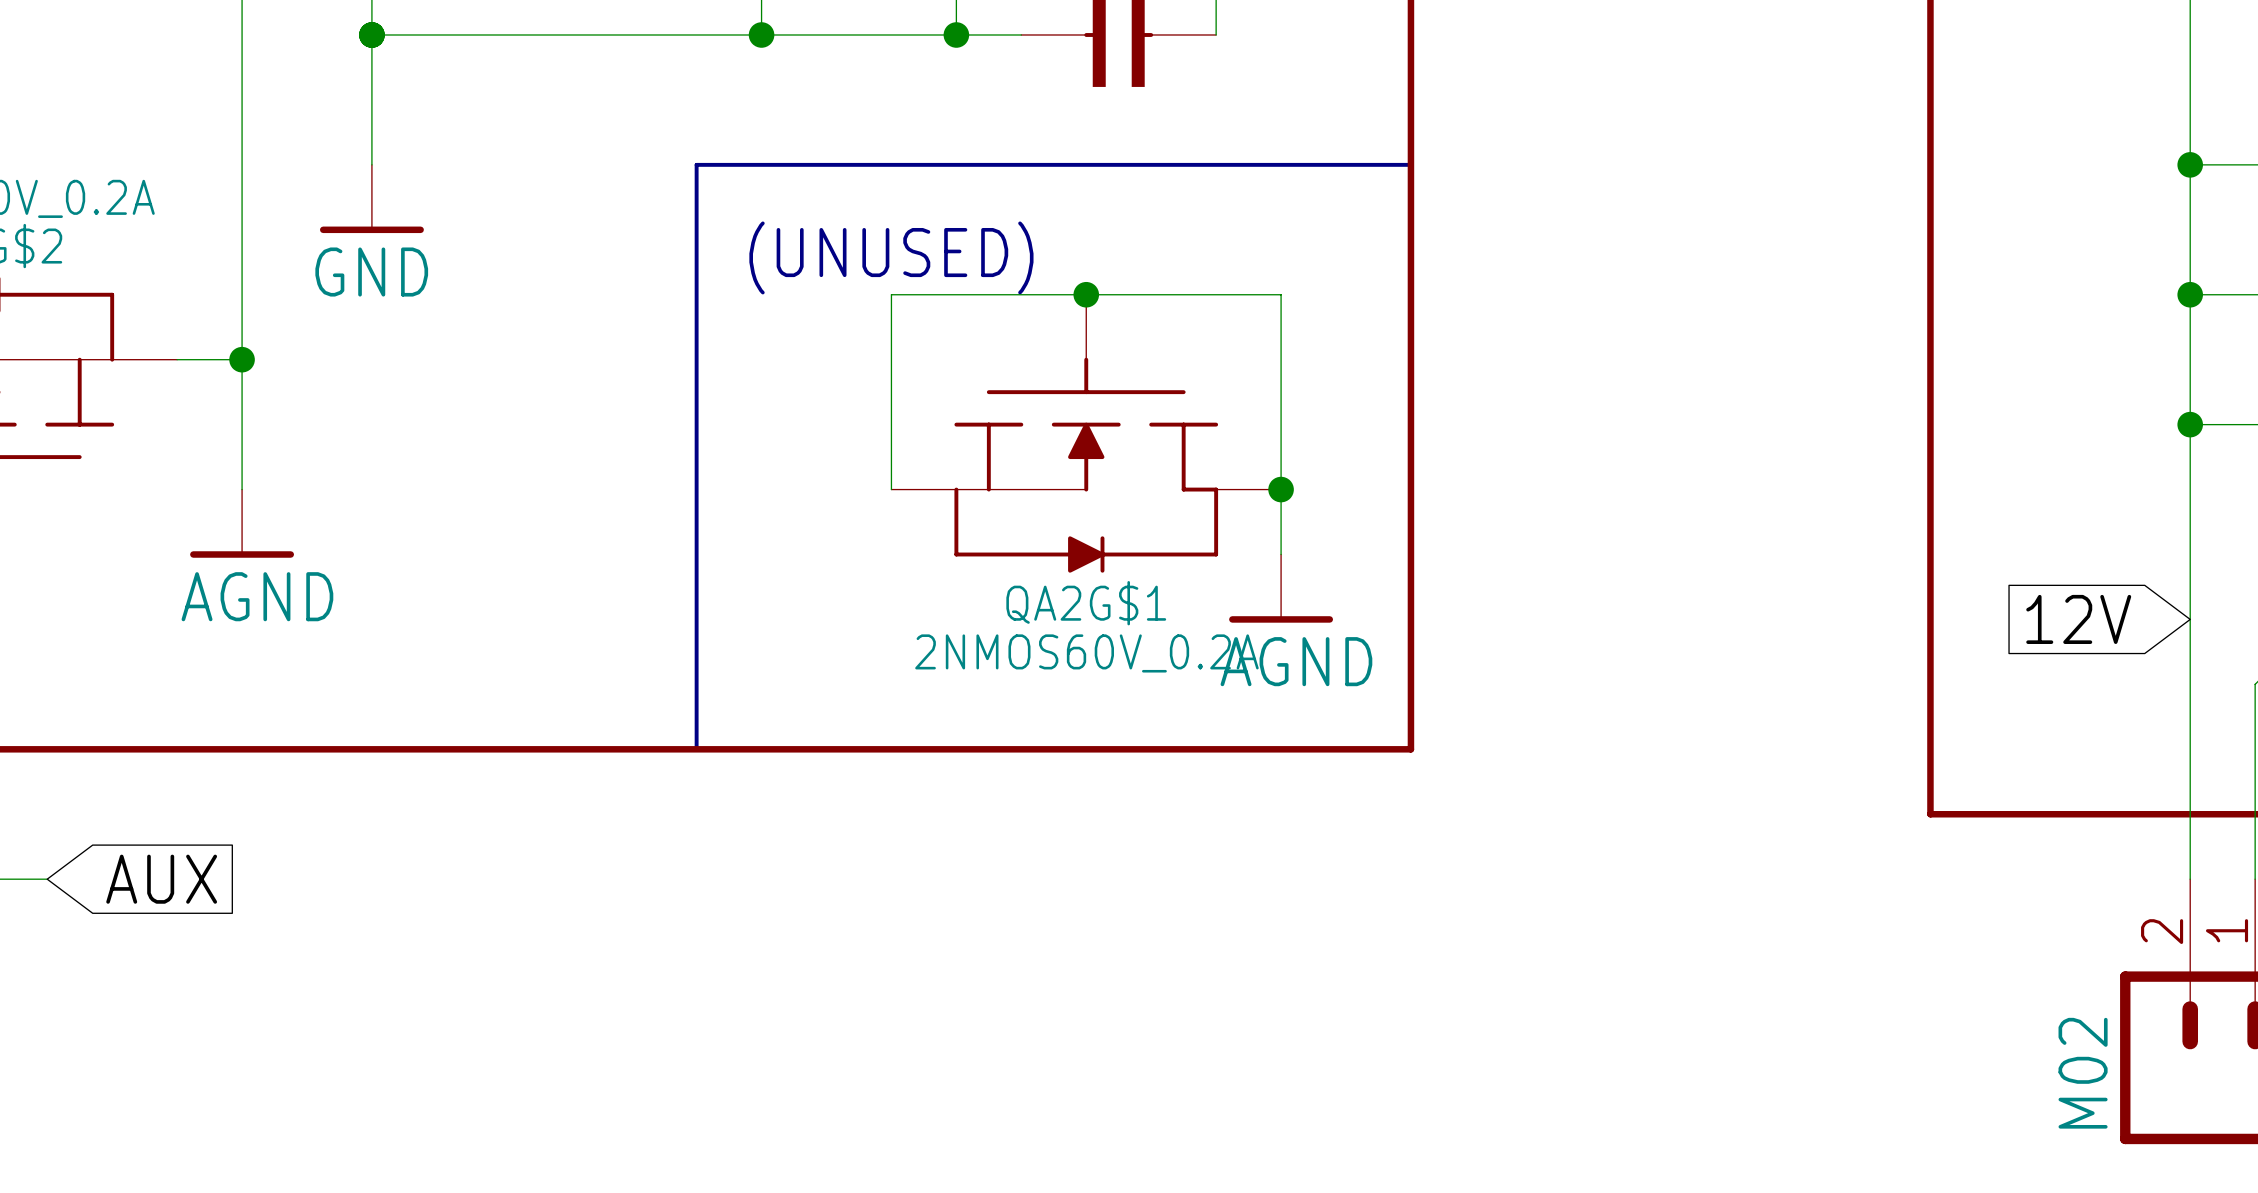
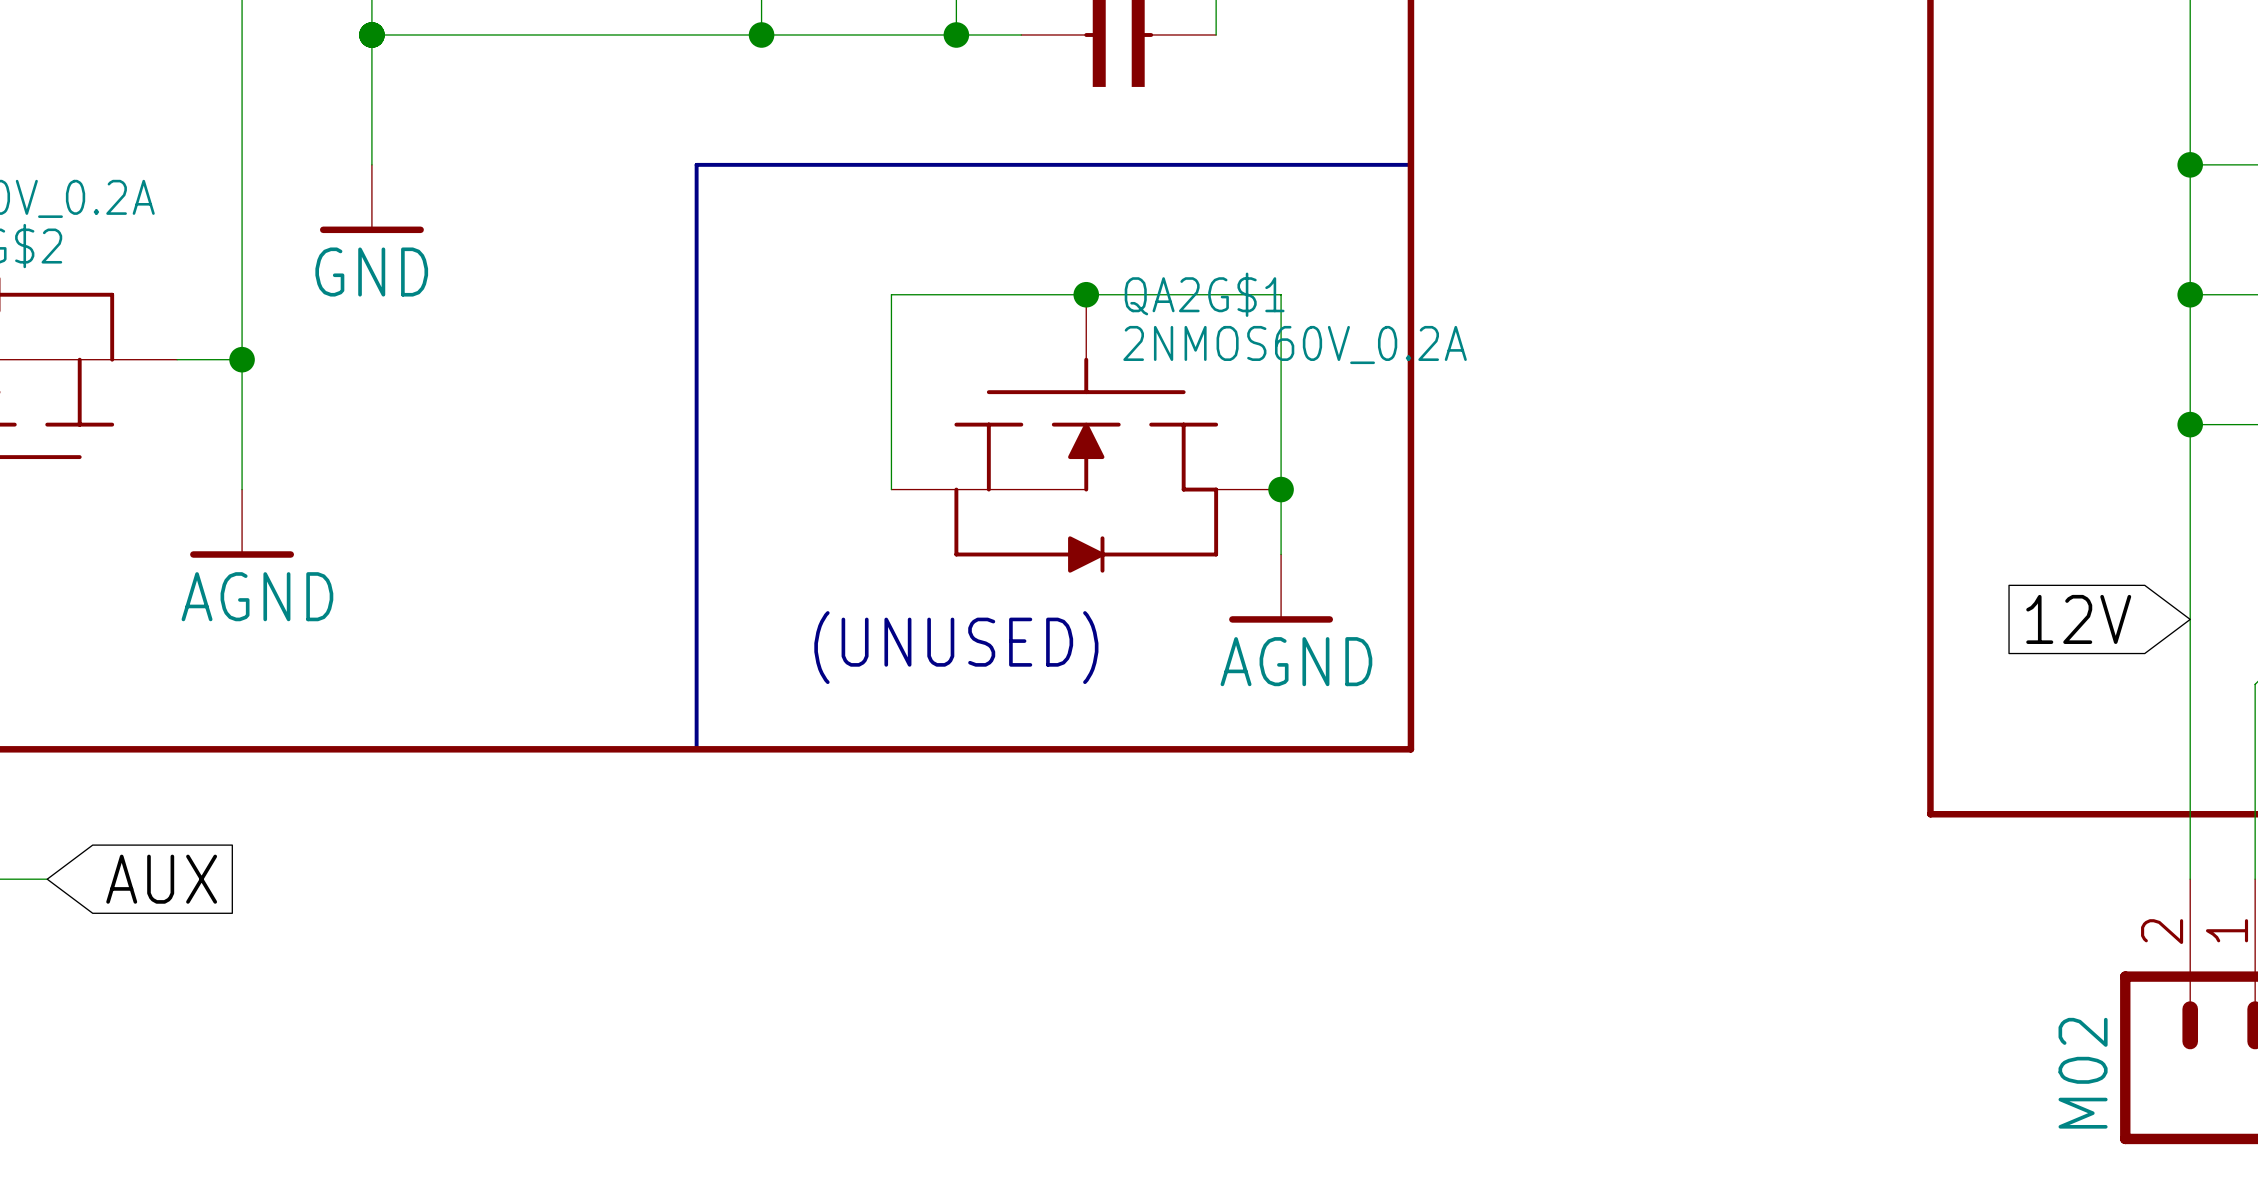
text position: (UNUSED) (891, 257) -> (UNUSED) (956, 647)
QA2G$1 name position: QA2G$1 (1086, 603) -> QA2G$1 (1204, 294)
QA2G$1 value position: 2NMOS60V_0.2A (1086, 653) -> 2NMOS60V_0.2A (1295, 344)

